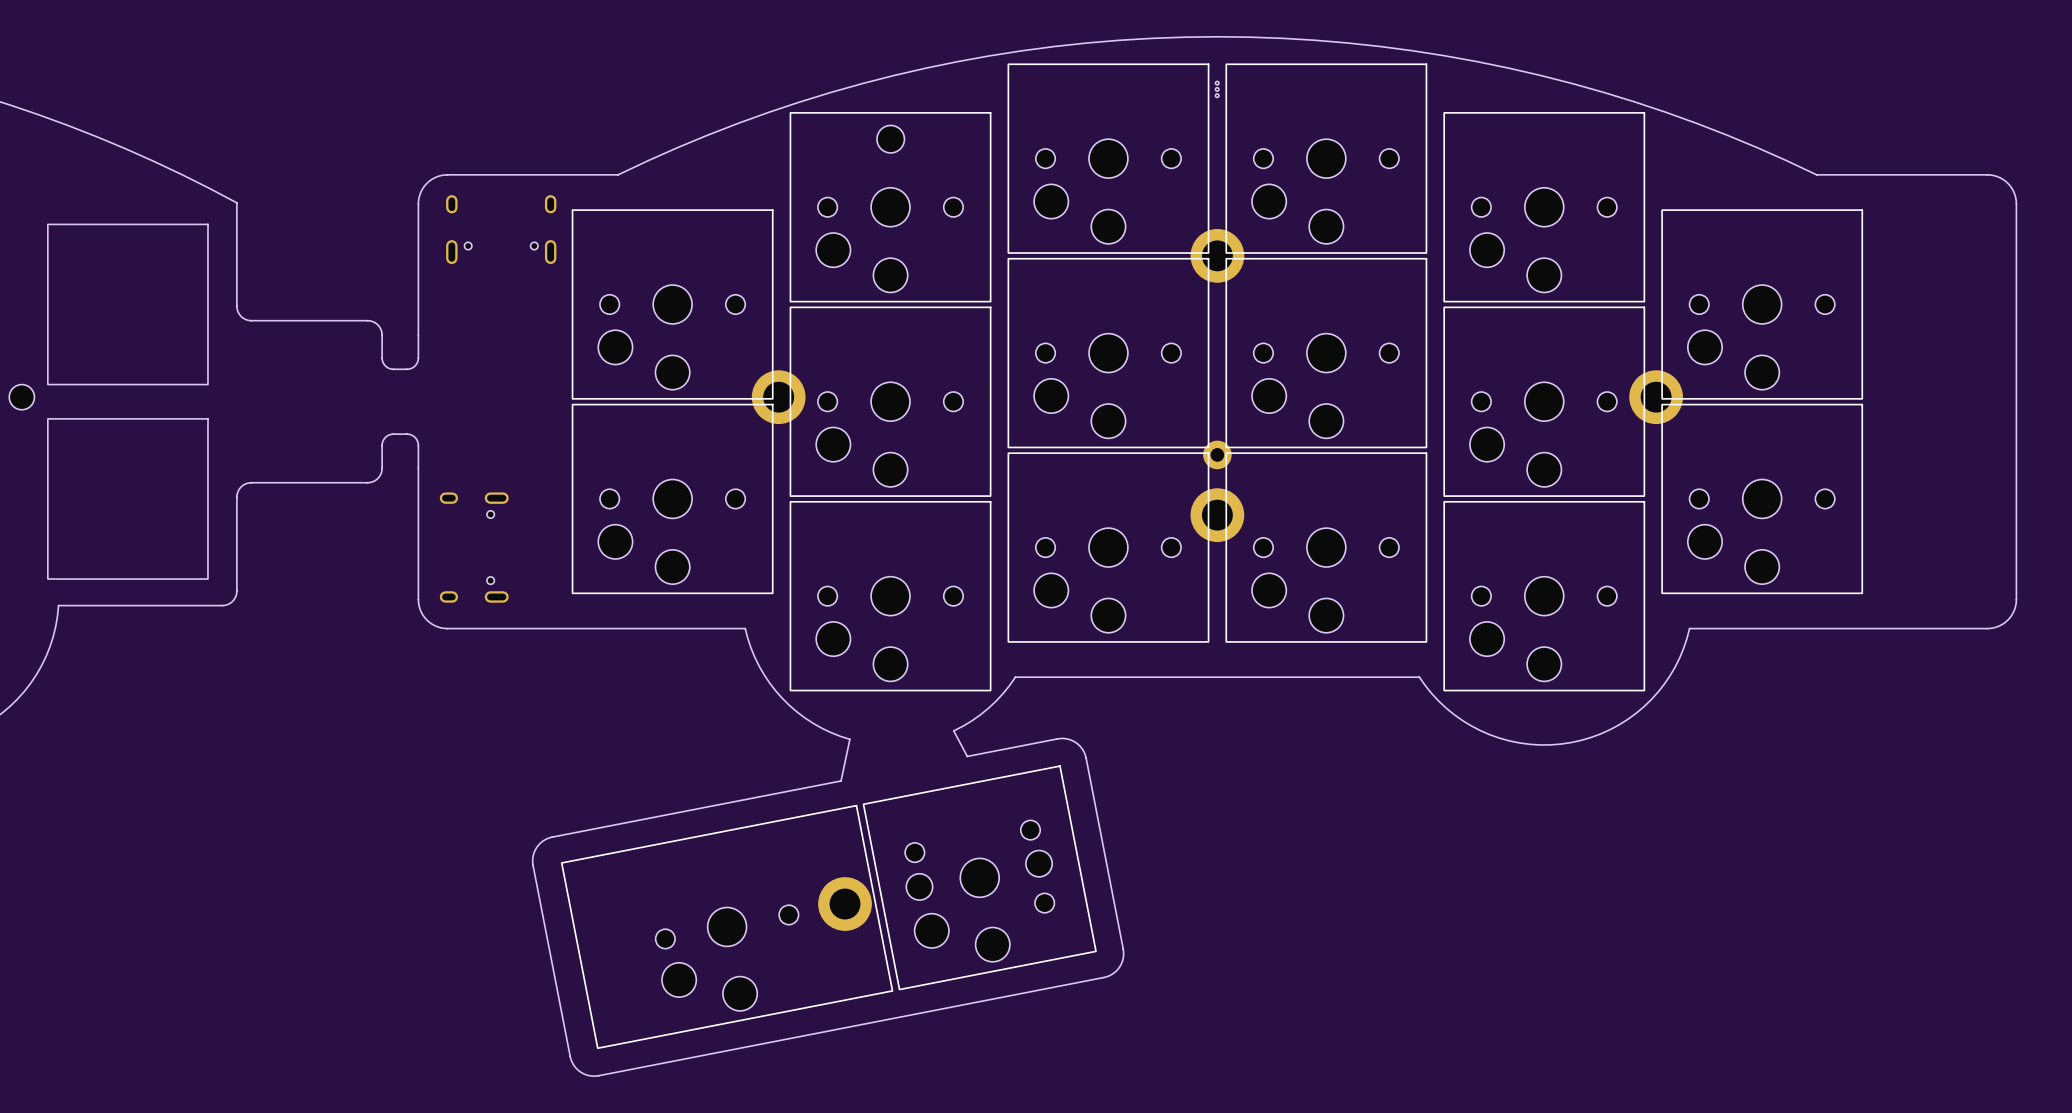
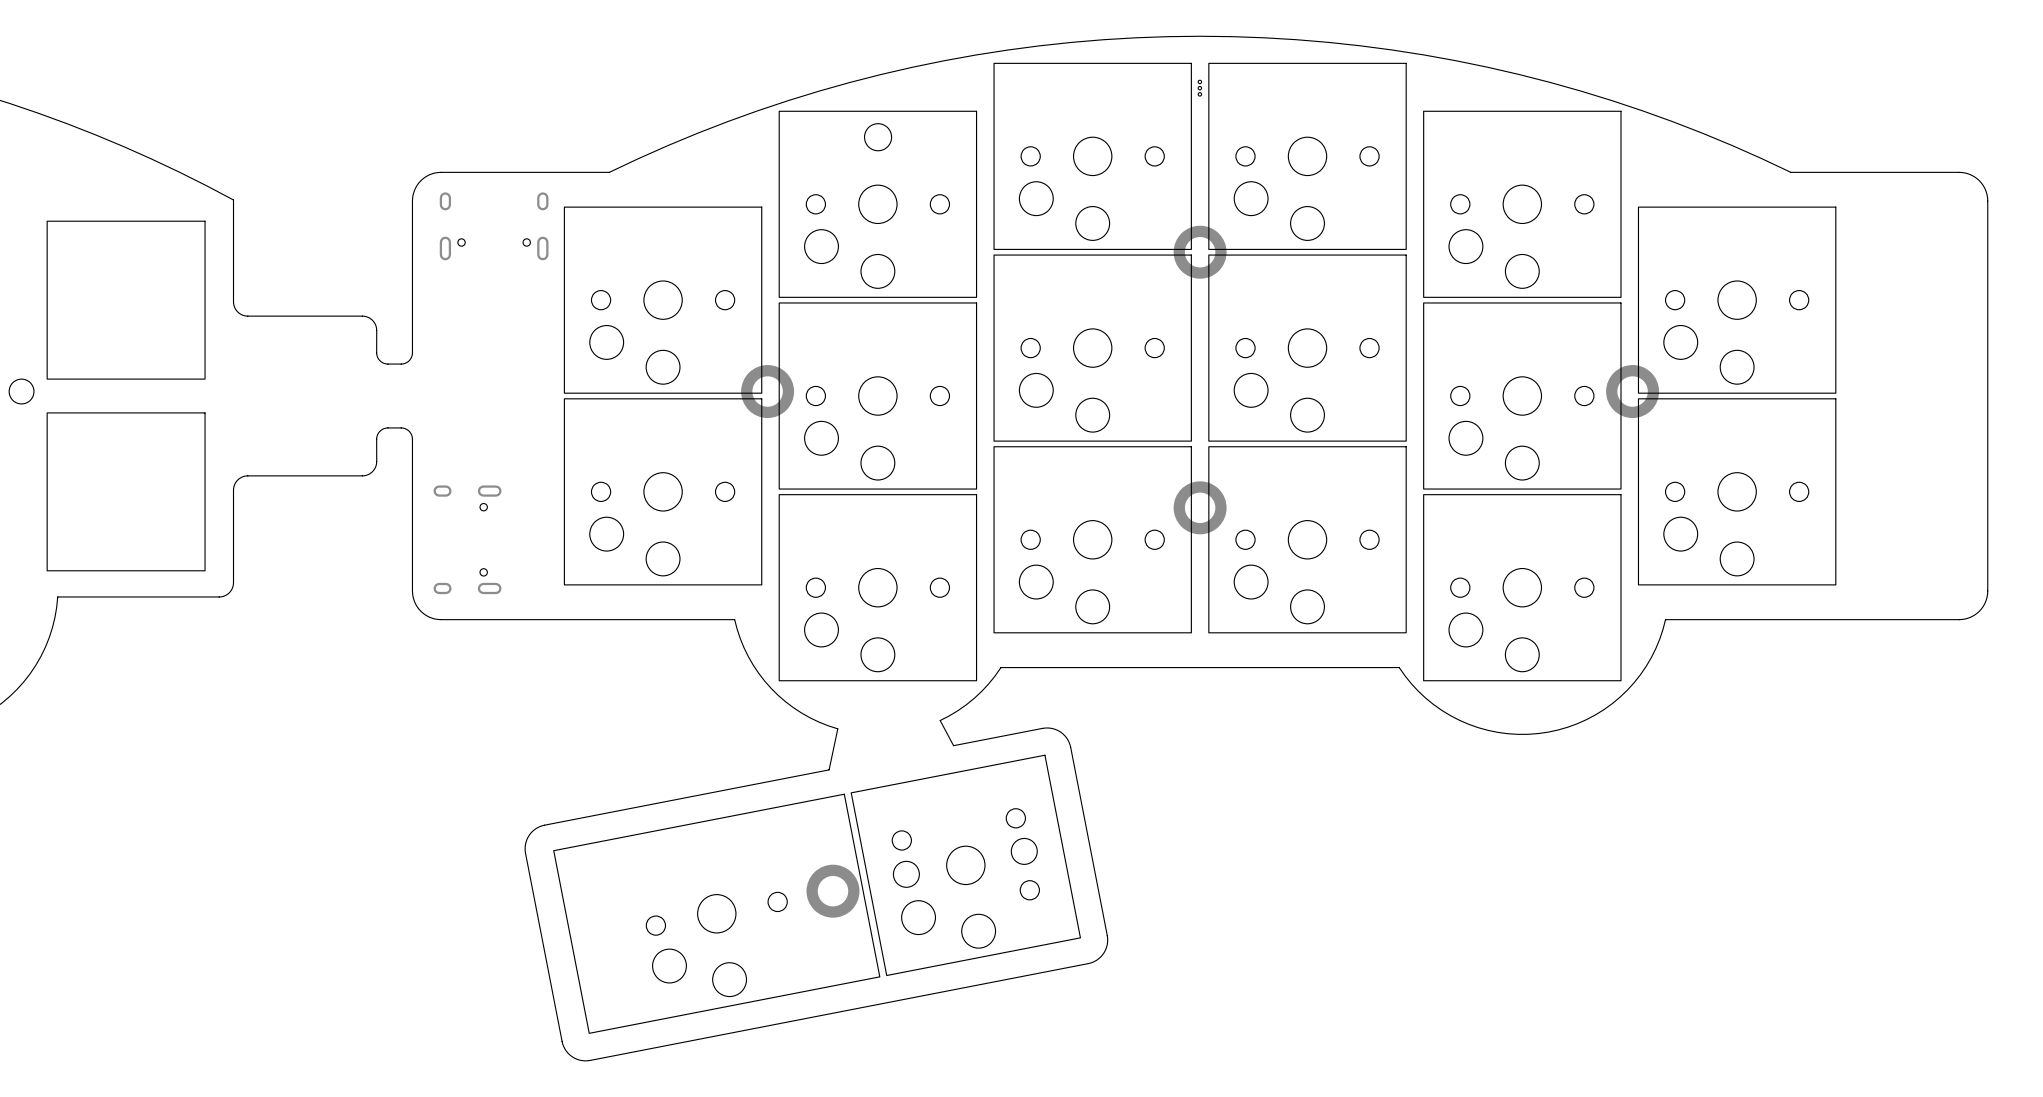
part: (1217, 454) -> none

